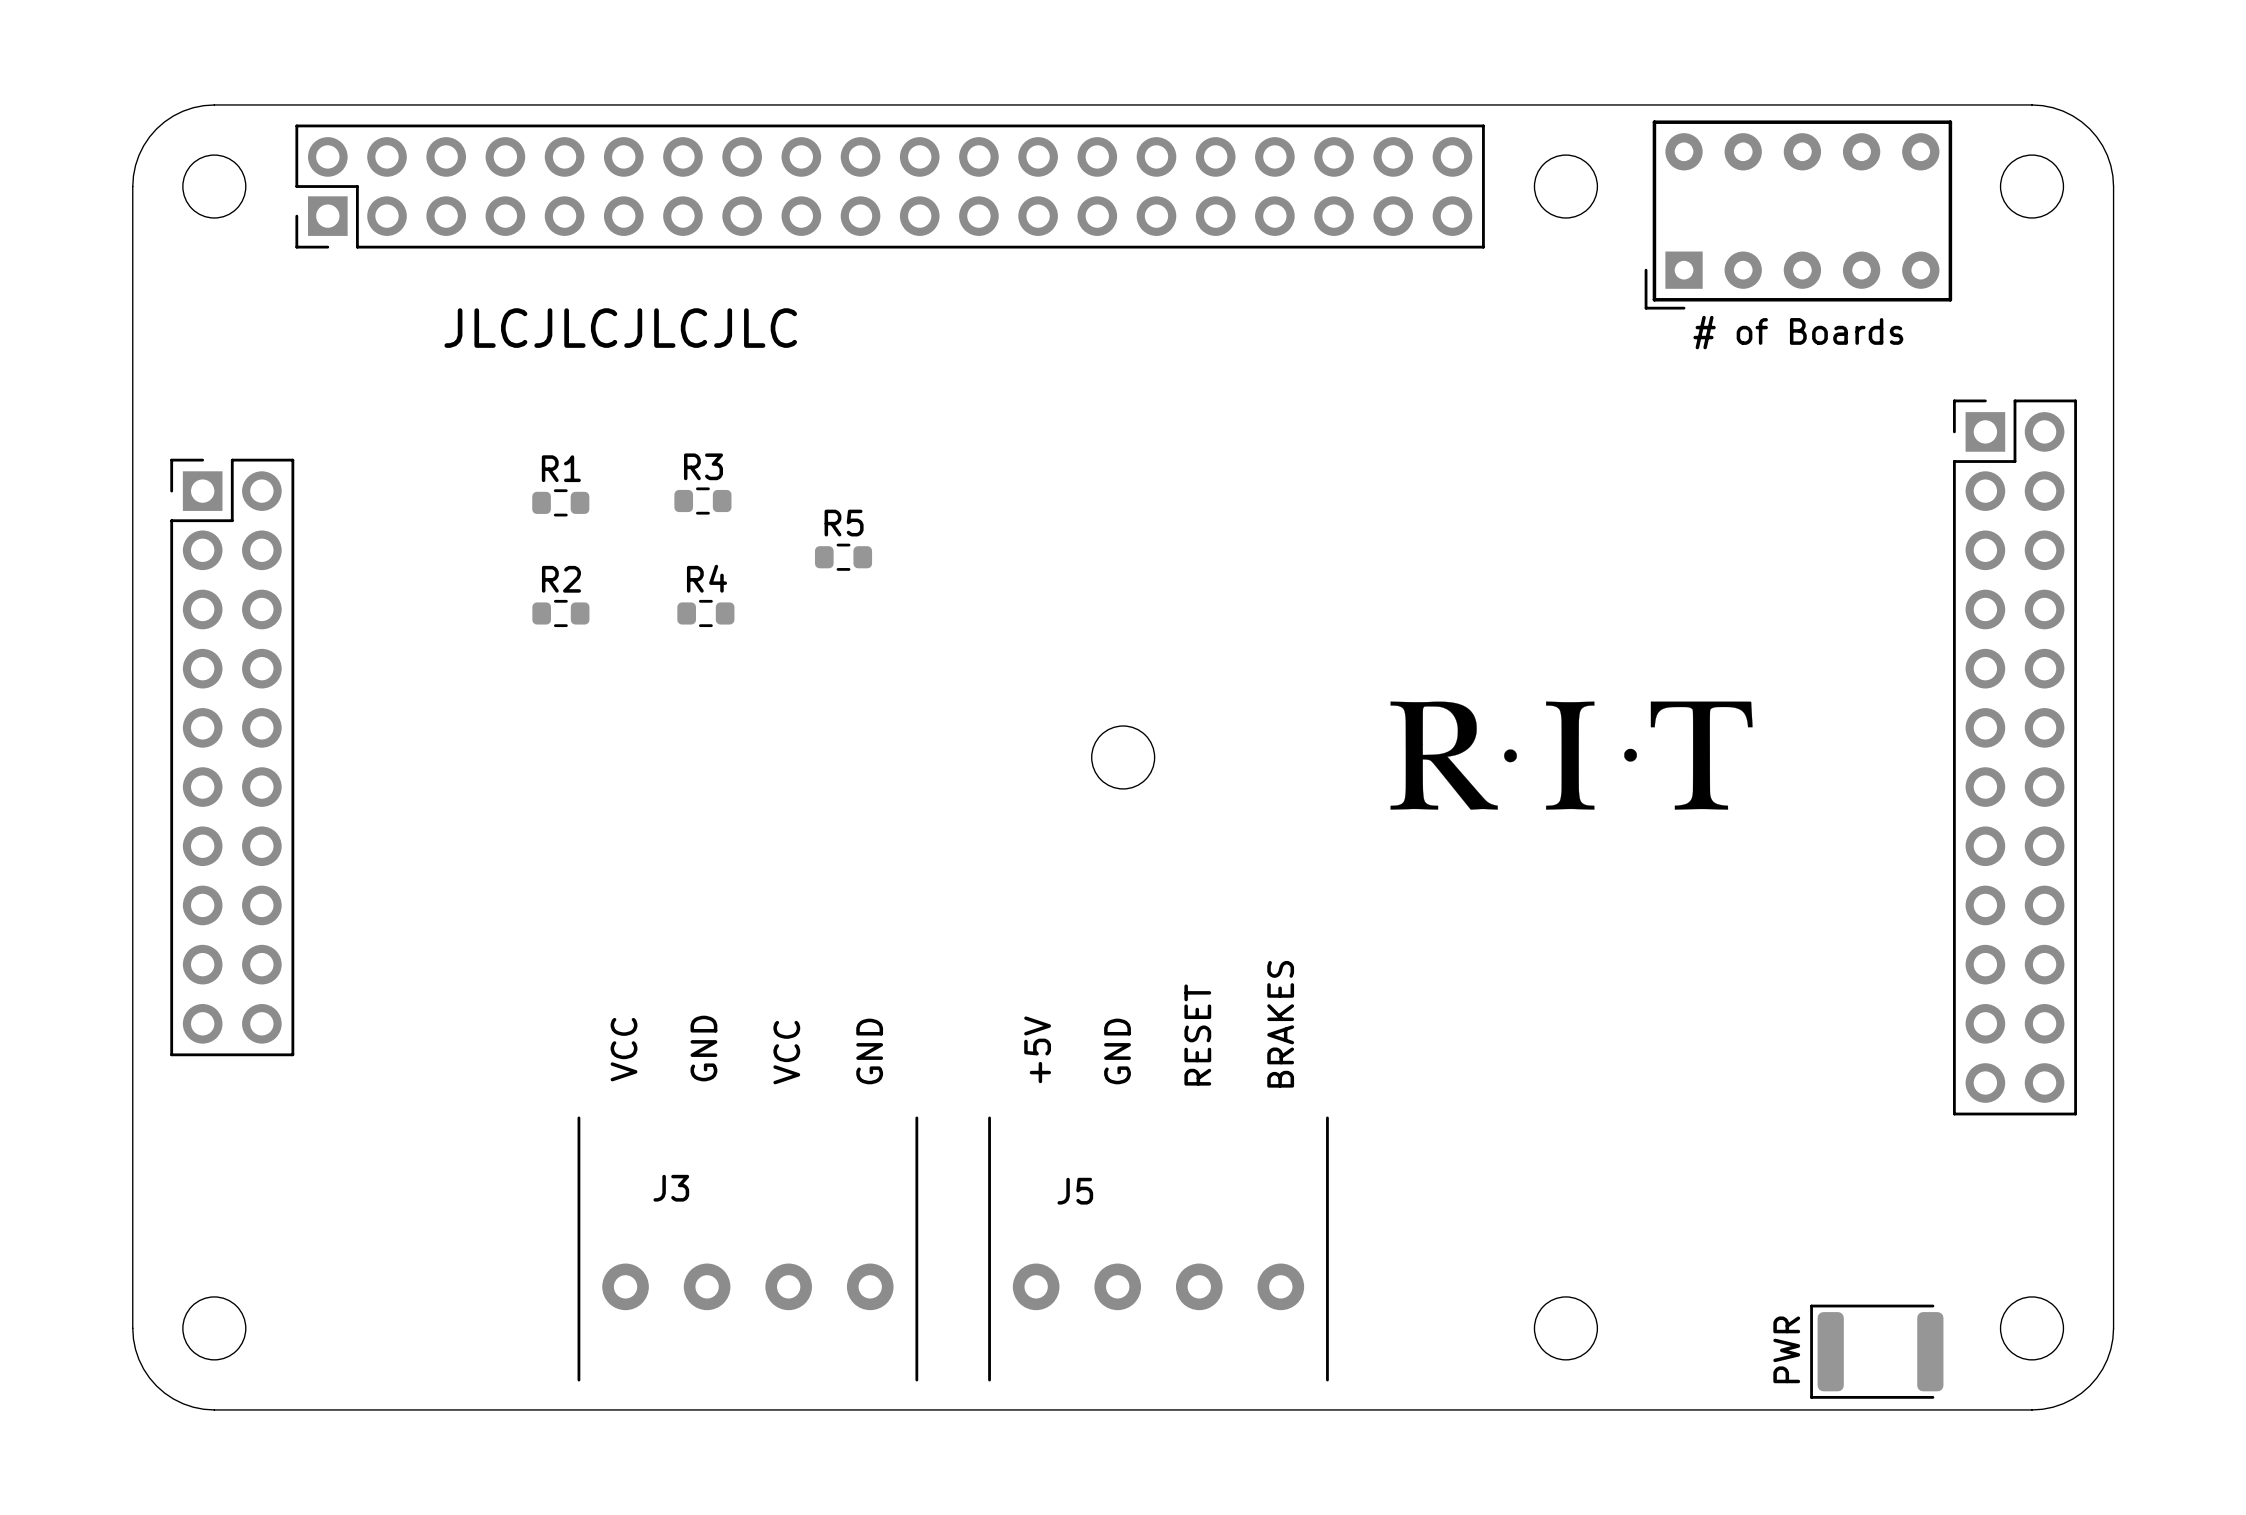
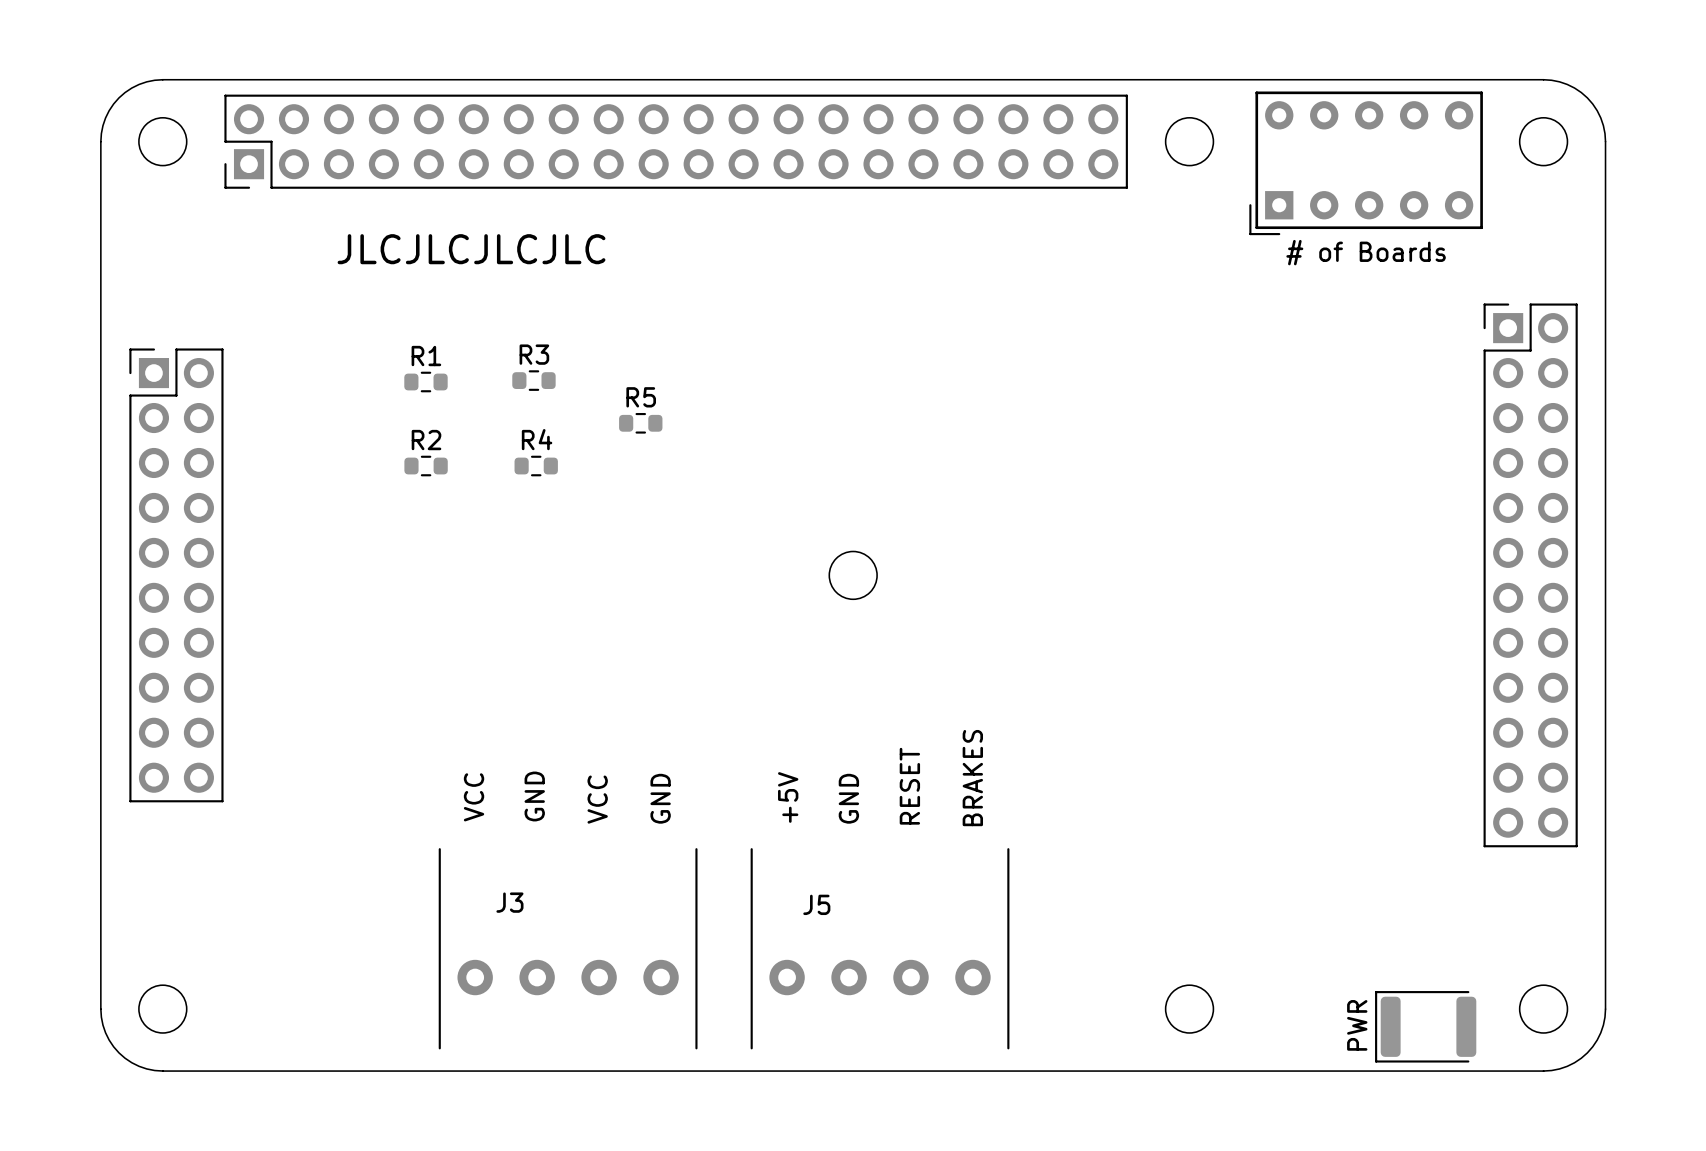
drawing: [1390, 701, 1753, 810] -> none

